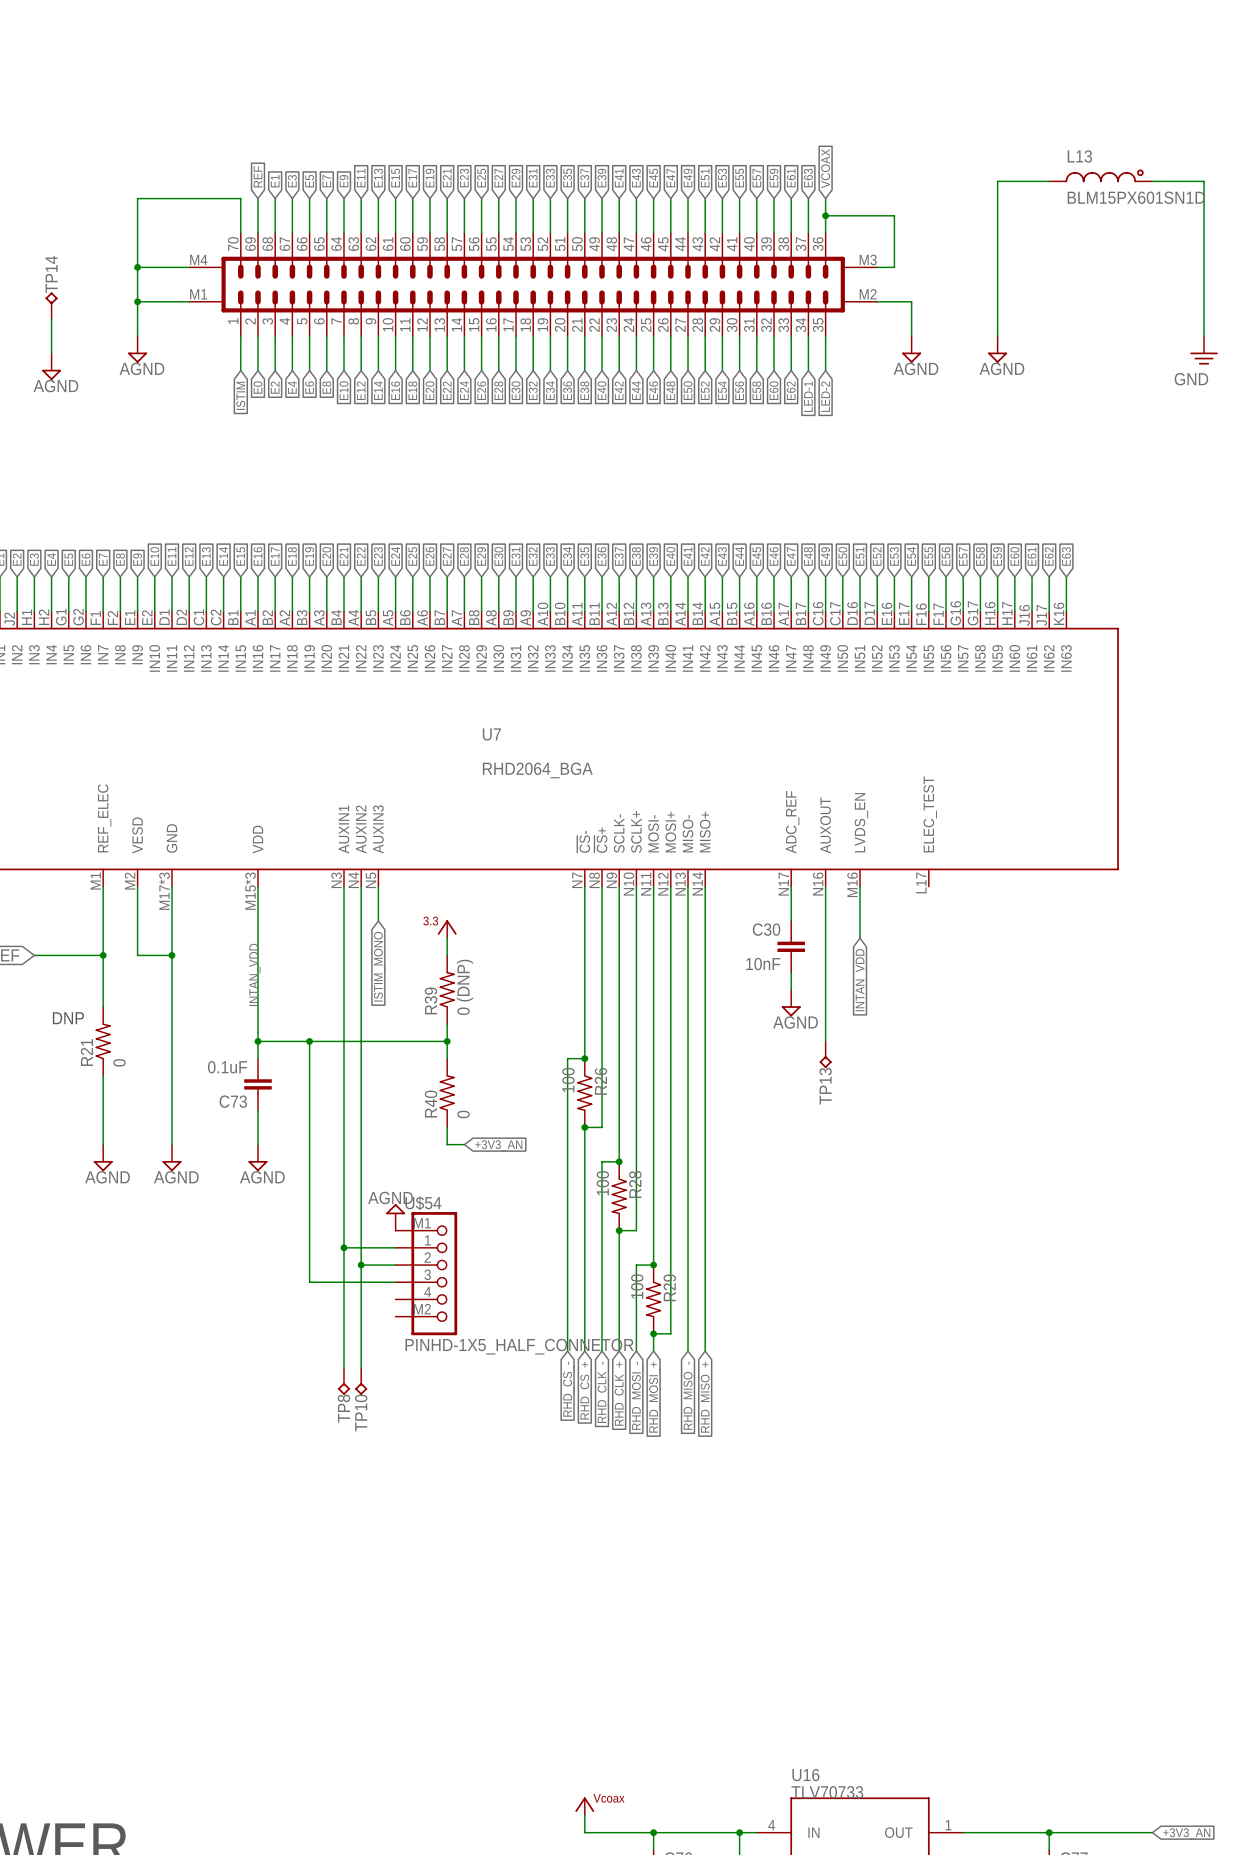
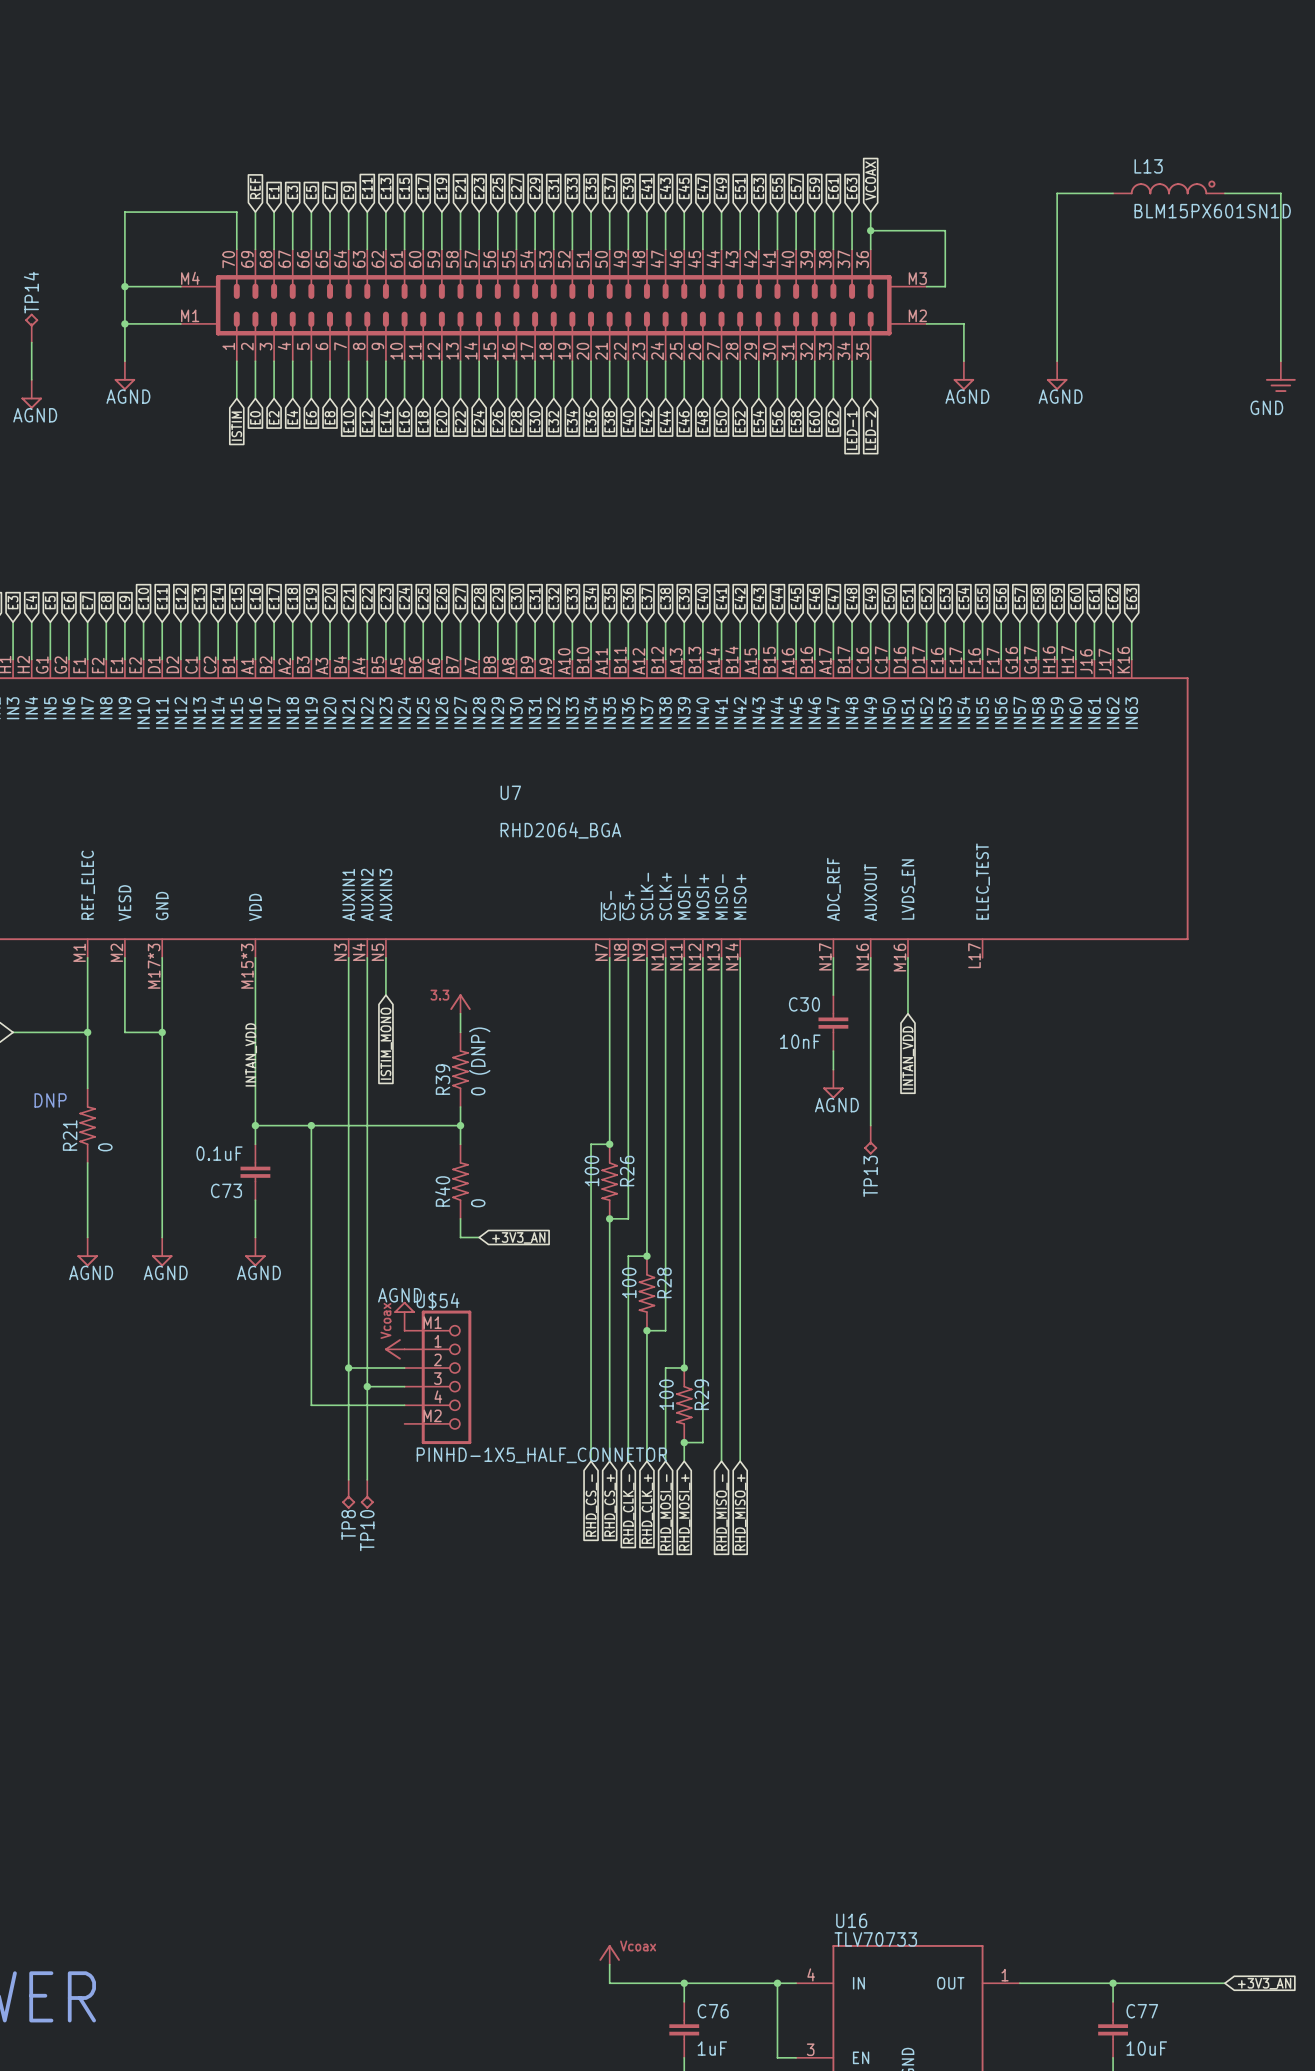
wire: (343, 1247) (395, 1247) -> none
junction: (343, 1247) -> none
power symbol: none -> (394, 1349)
wire: none -> (348, 1368) (367, 1368)
junction: none -> (348, 1368)
junction: (361, 1265) -> none
wire: (309, 1282) (361, 1282) -> (311, 1386) (311, 1405) (404, 1405)
junction: none -> (367, 1386)

